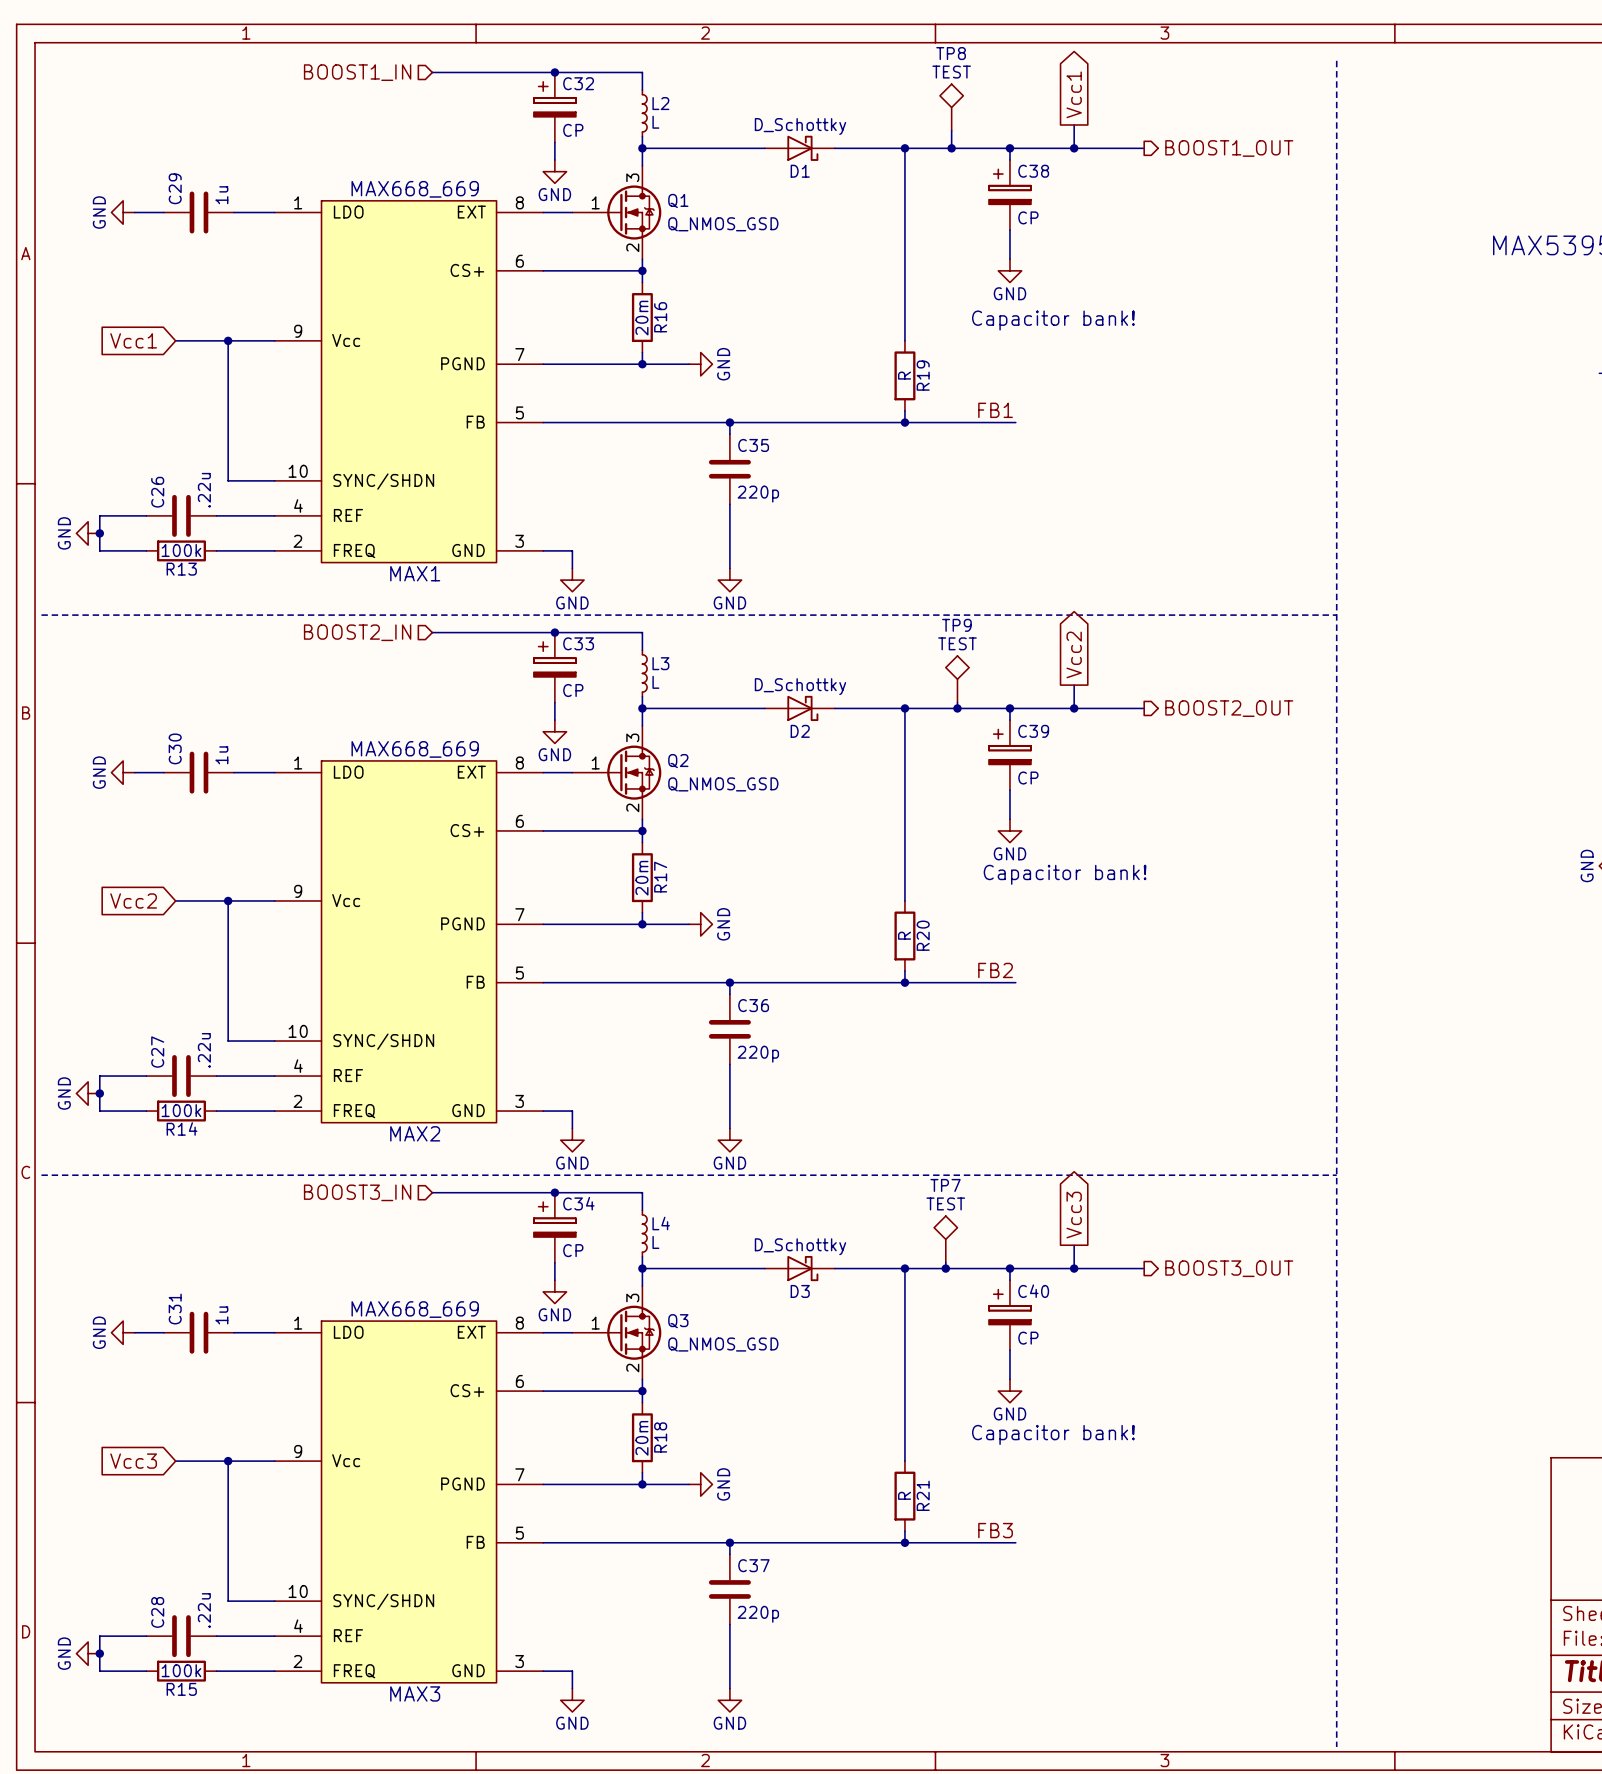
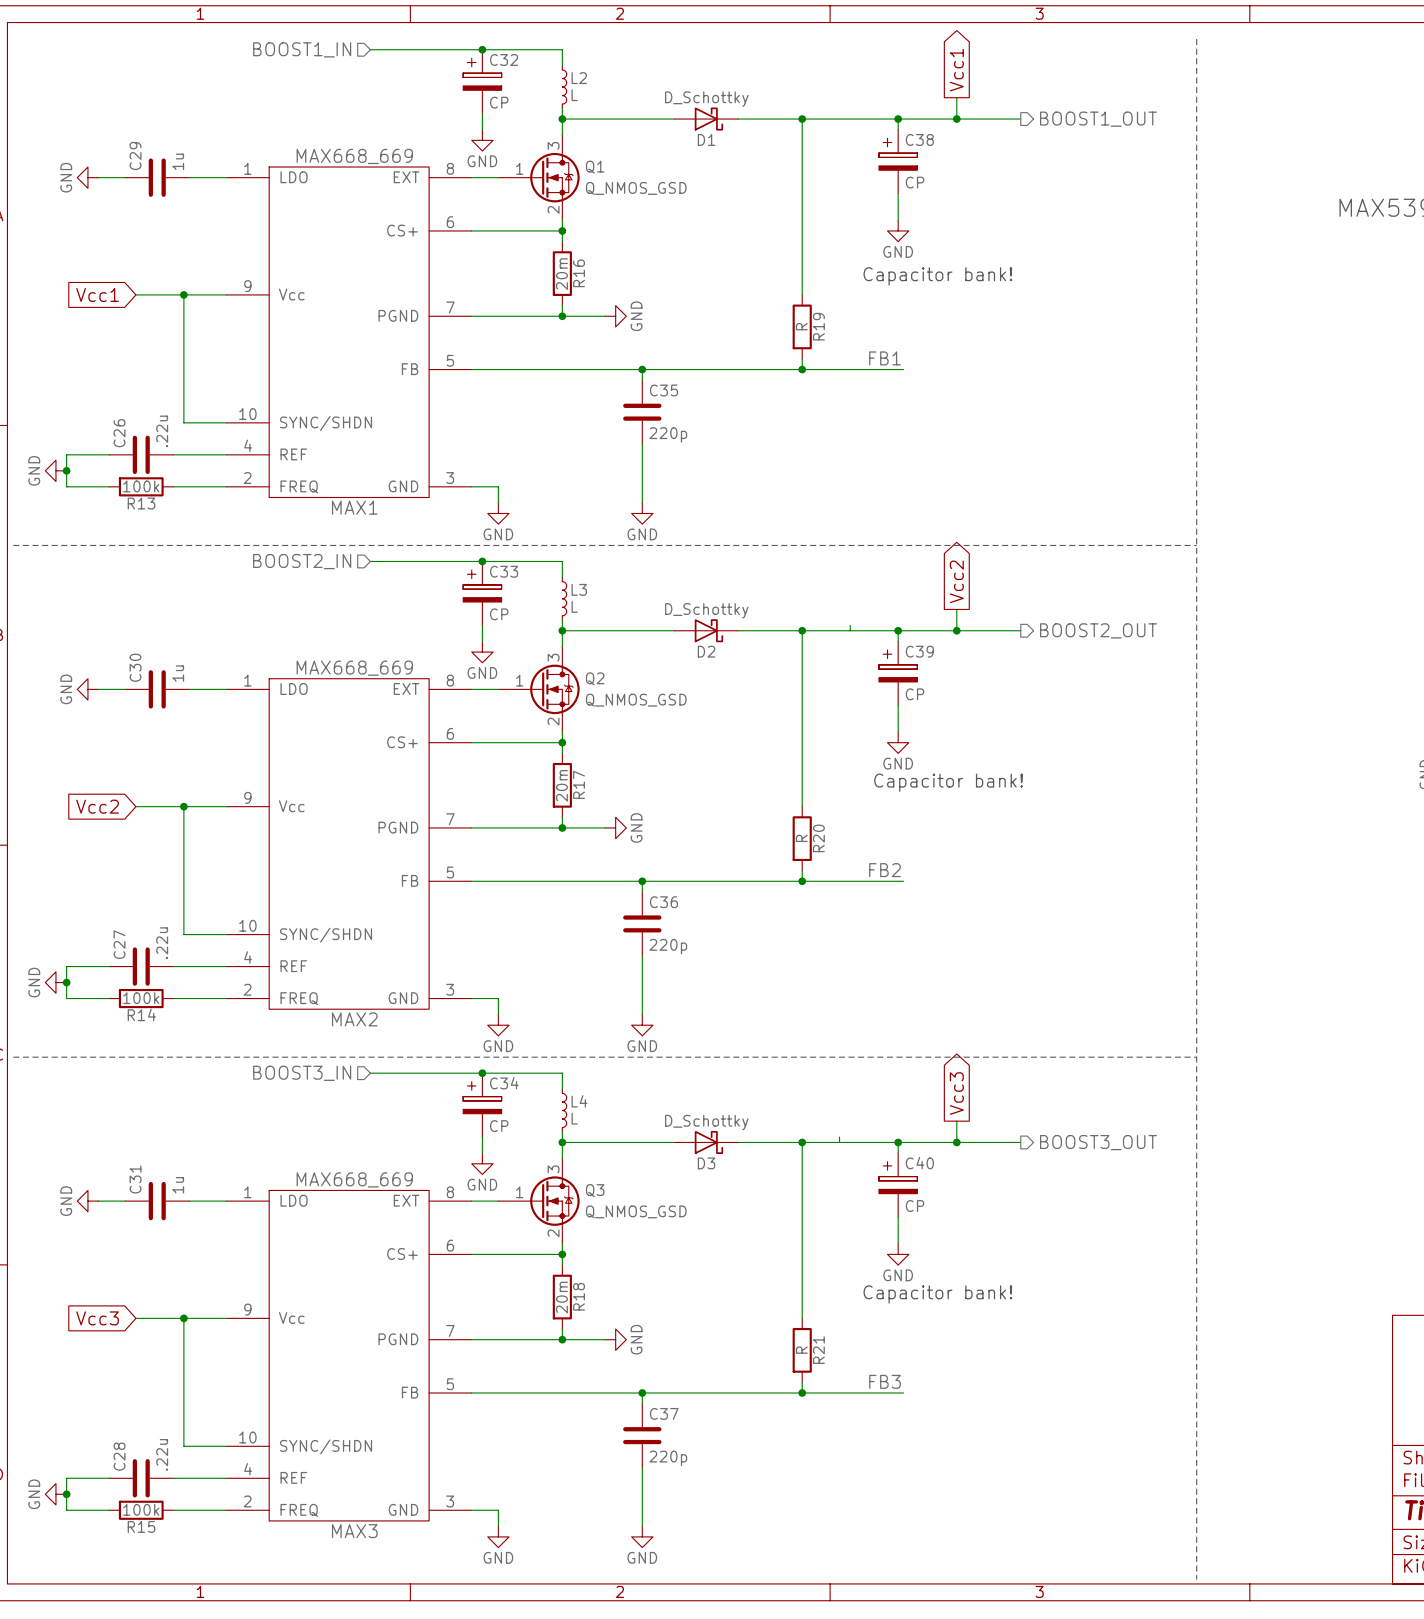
TP8: TEST (951, 107) -> none
wire: (951, 130) (951, 148) -> none
junction: (951, 148) -> none
TP9: TEST (957, 679) -> none
junction: (957, 708) -> none
TP7: TEST (945, 1239) -> none
junction: (945, 1268) -> none

